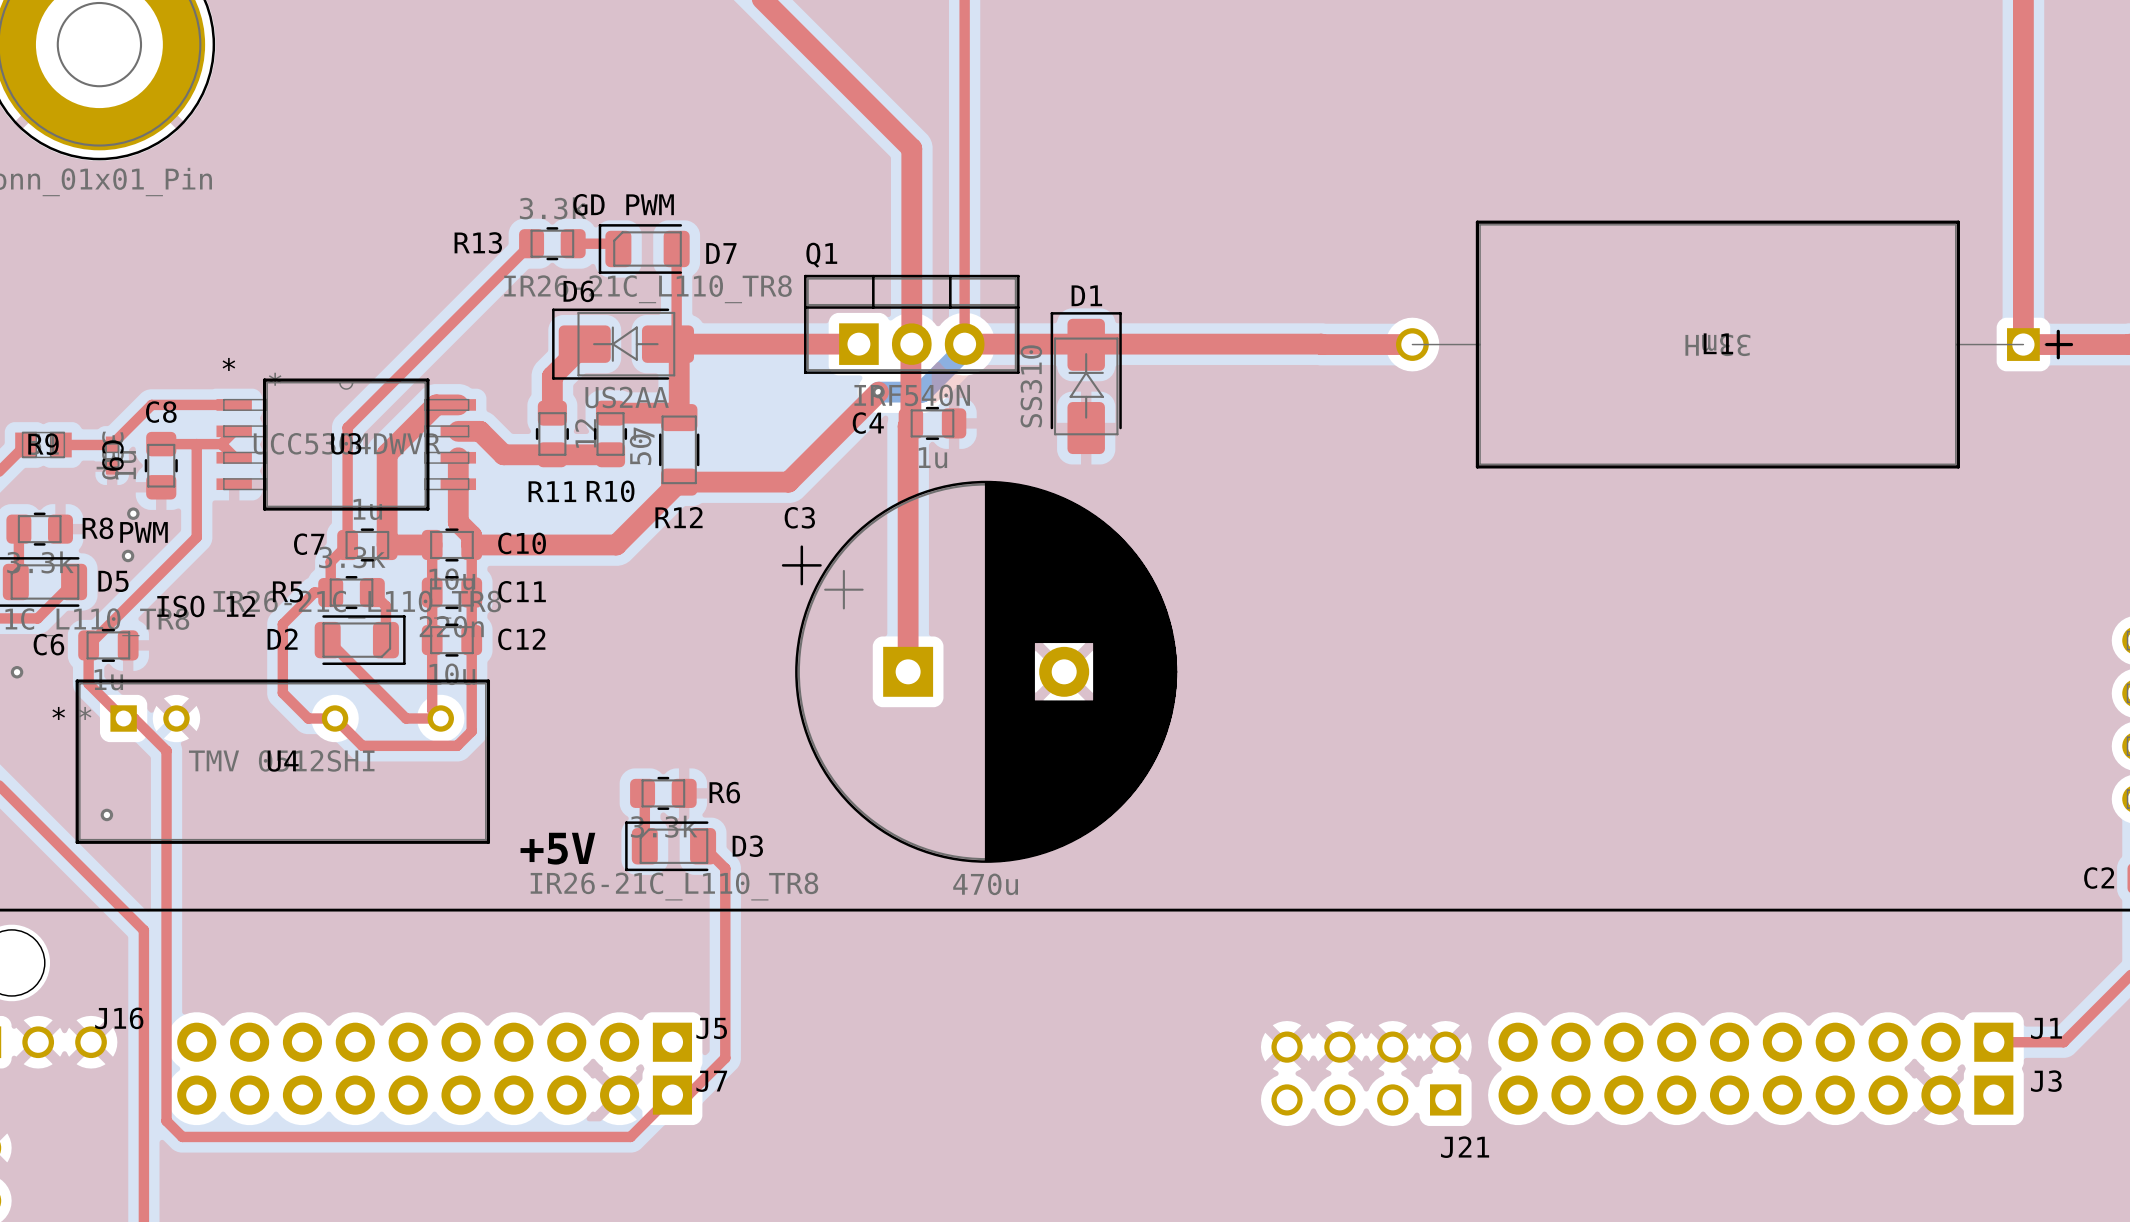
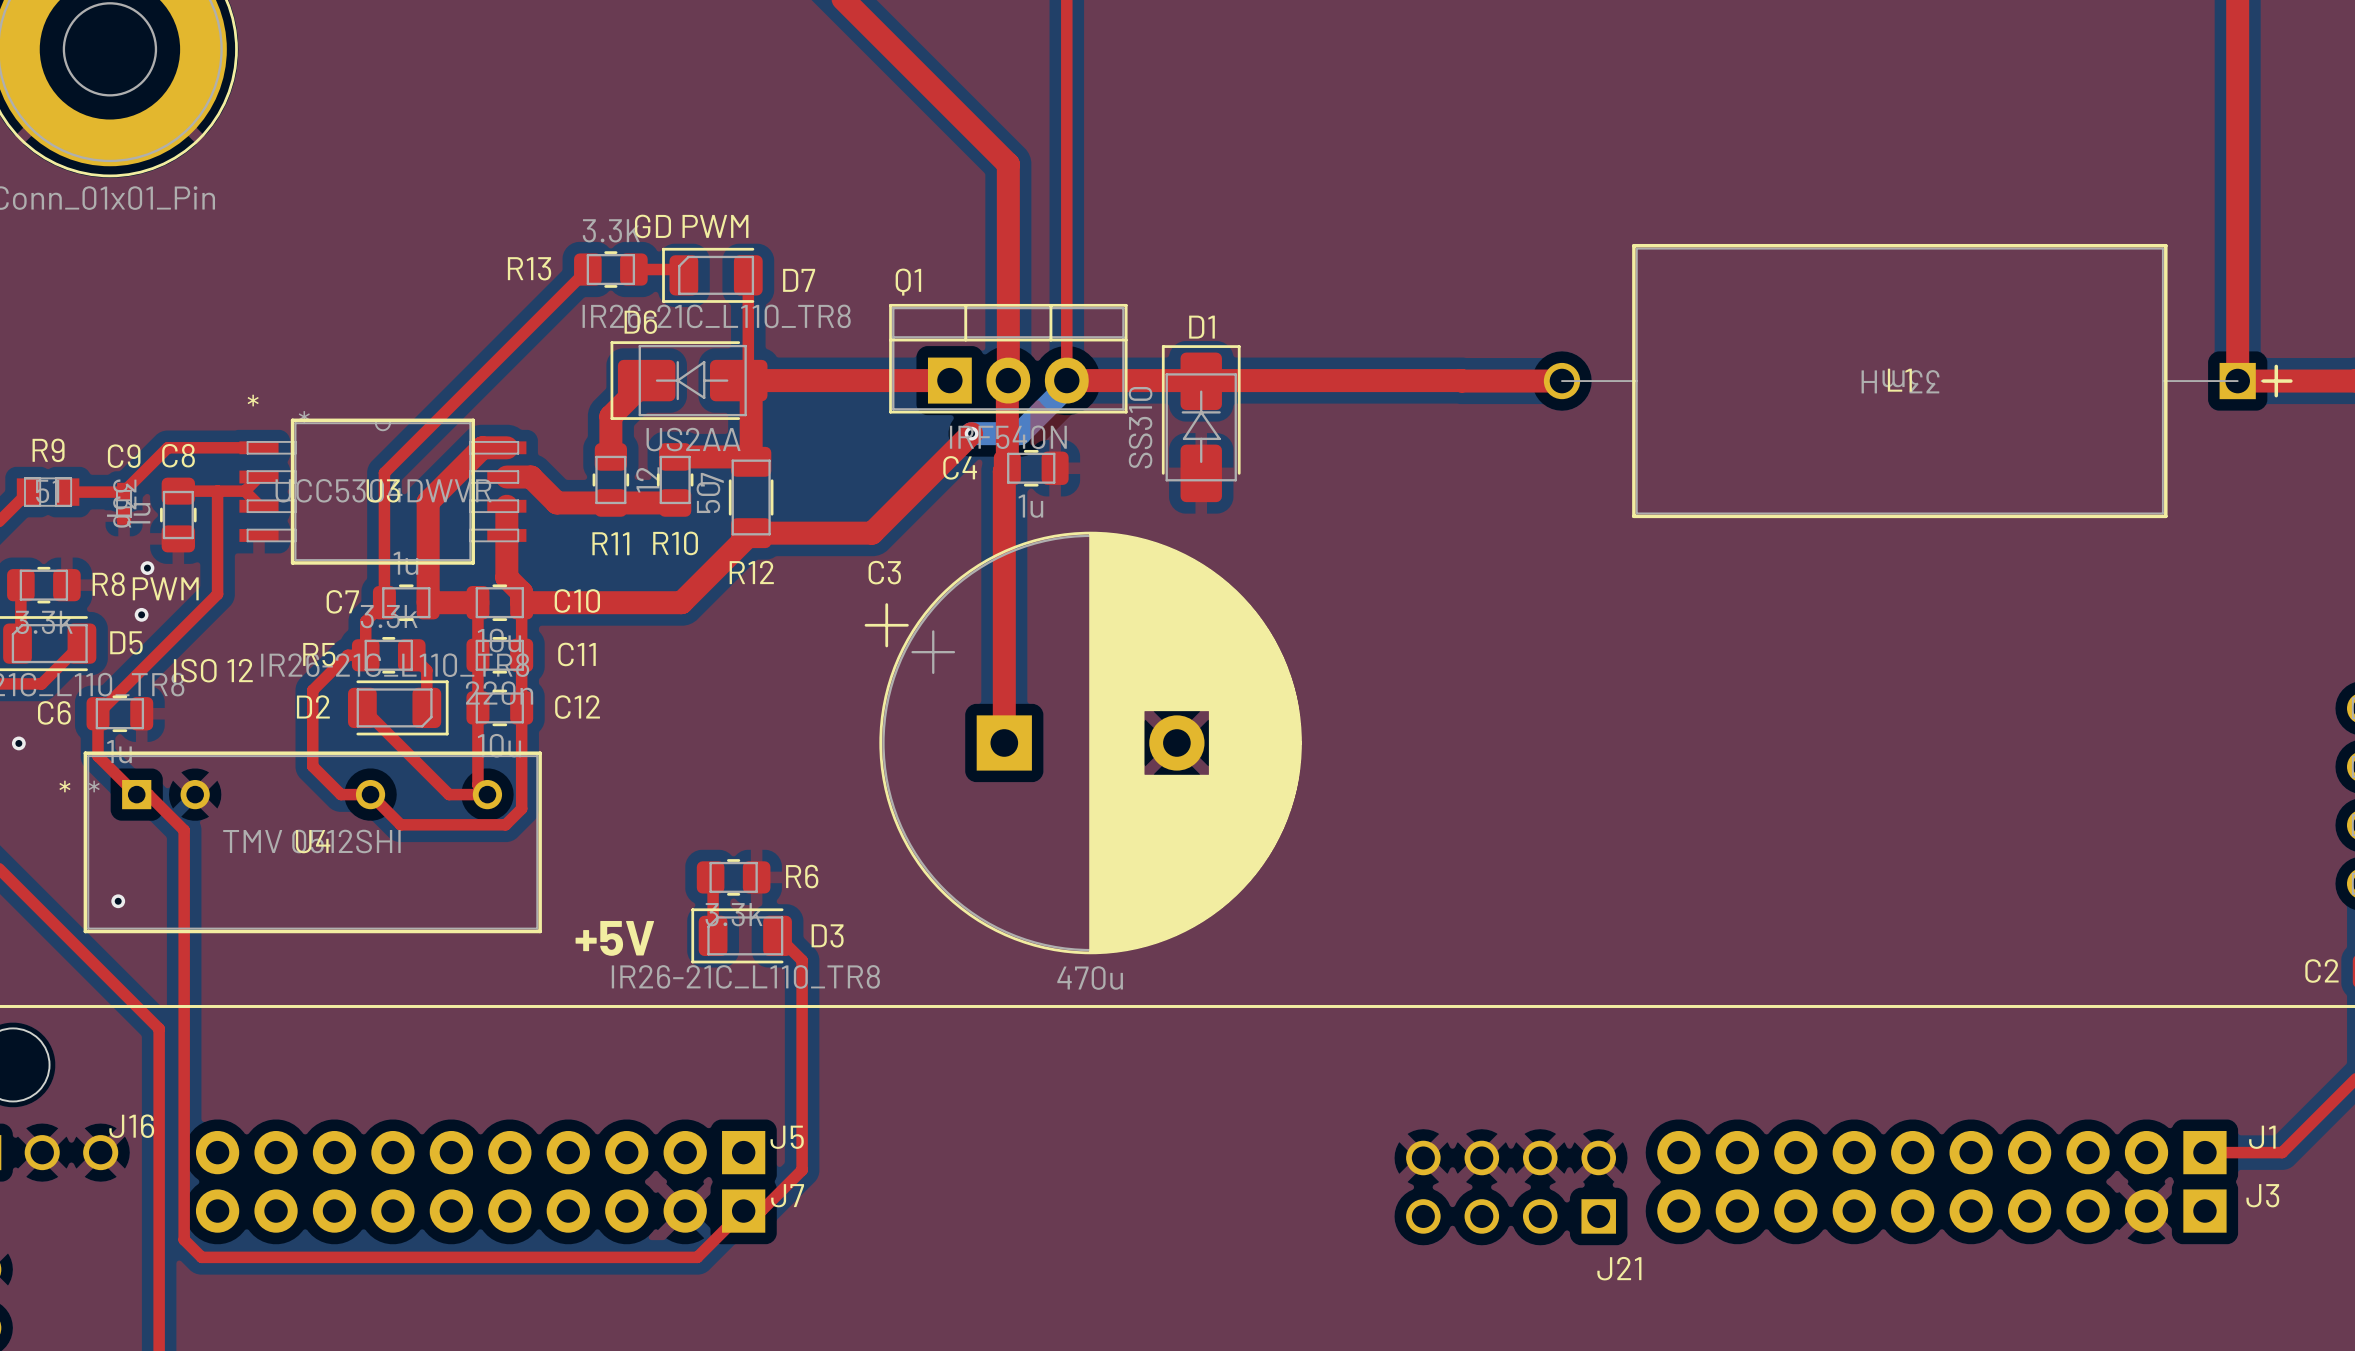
R9 name position: R9 (43, 444) -> R9 (48, 450)
C9 name rotation: 0° (112, 455) -> 90° counterclockwise (124, 456)

